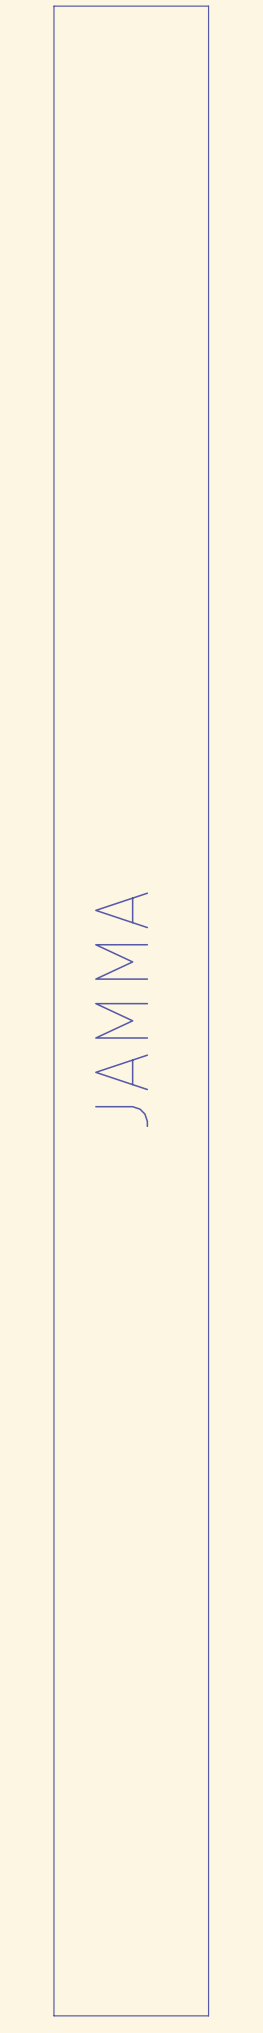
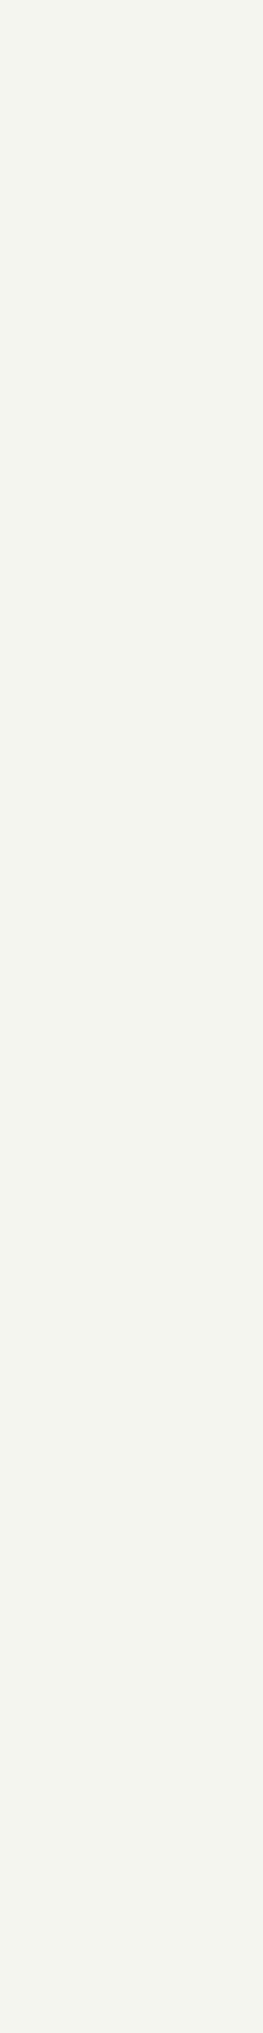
line: (53, 6) (208, 6) (208, 2015) (53, 2015) (53, 6) -> none
text: JAMMA (121, 1009) -> none

